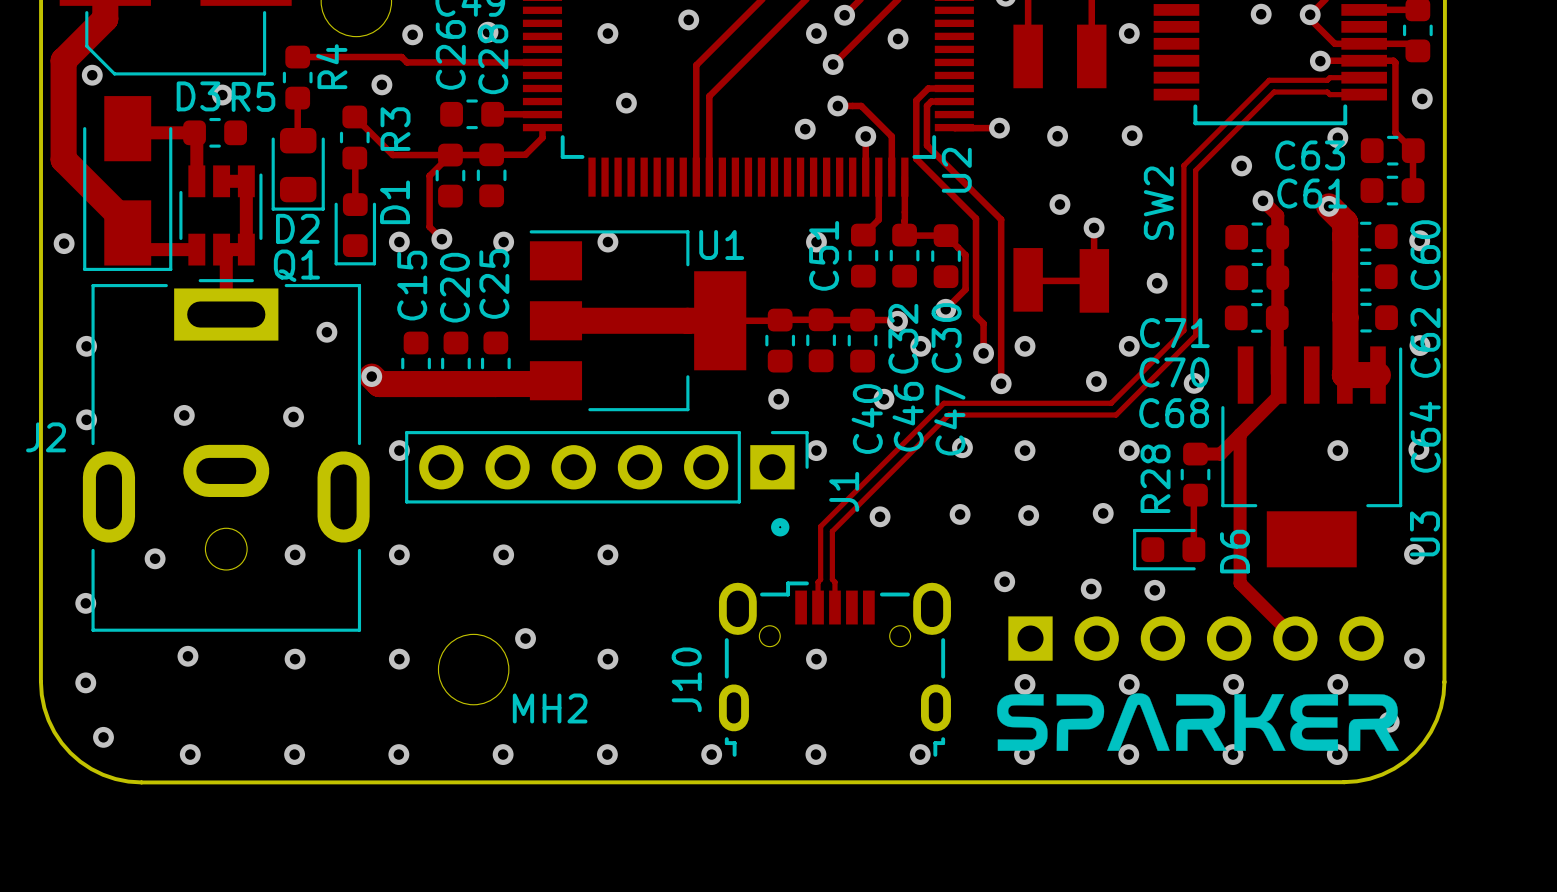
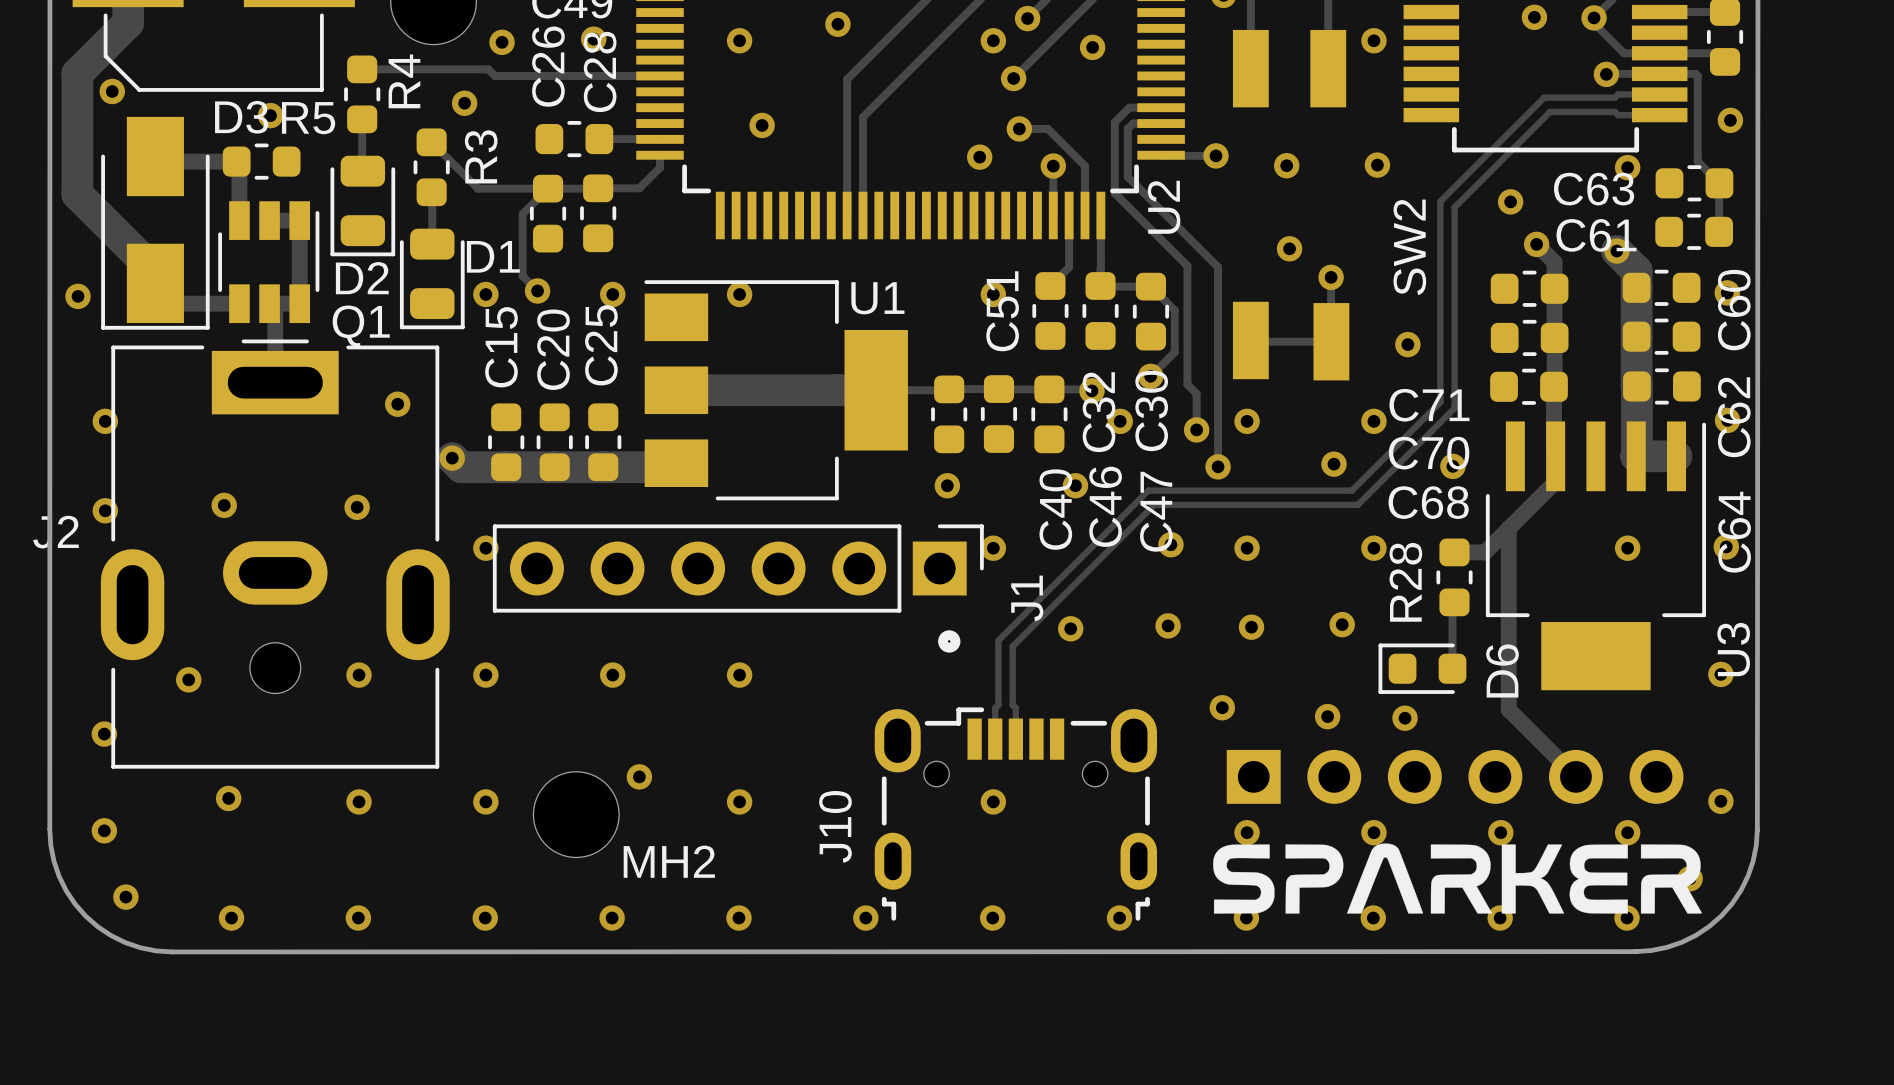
D1 footprint: [334, 193, 377, 266] -> [399, 228, 465, 330]
D1 name rotation: 0° (395, 202) -> 90° clockwise (493, 256)

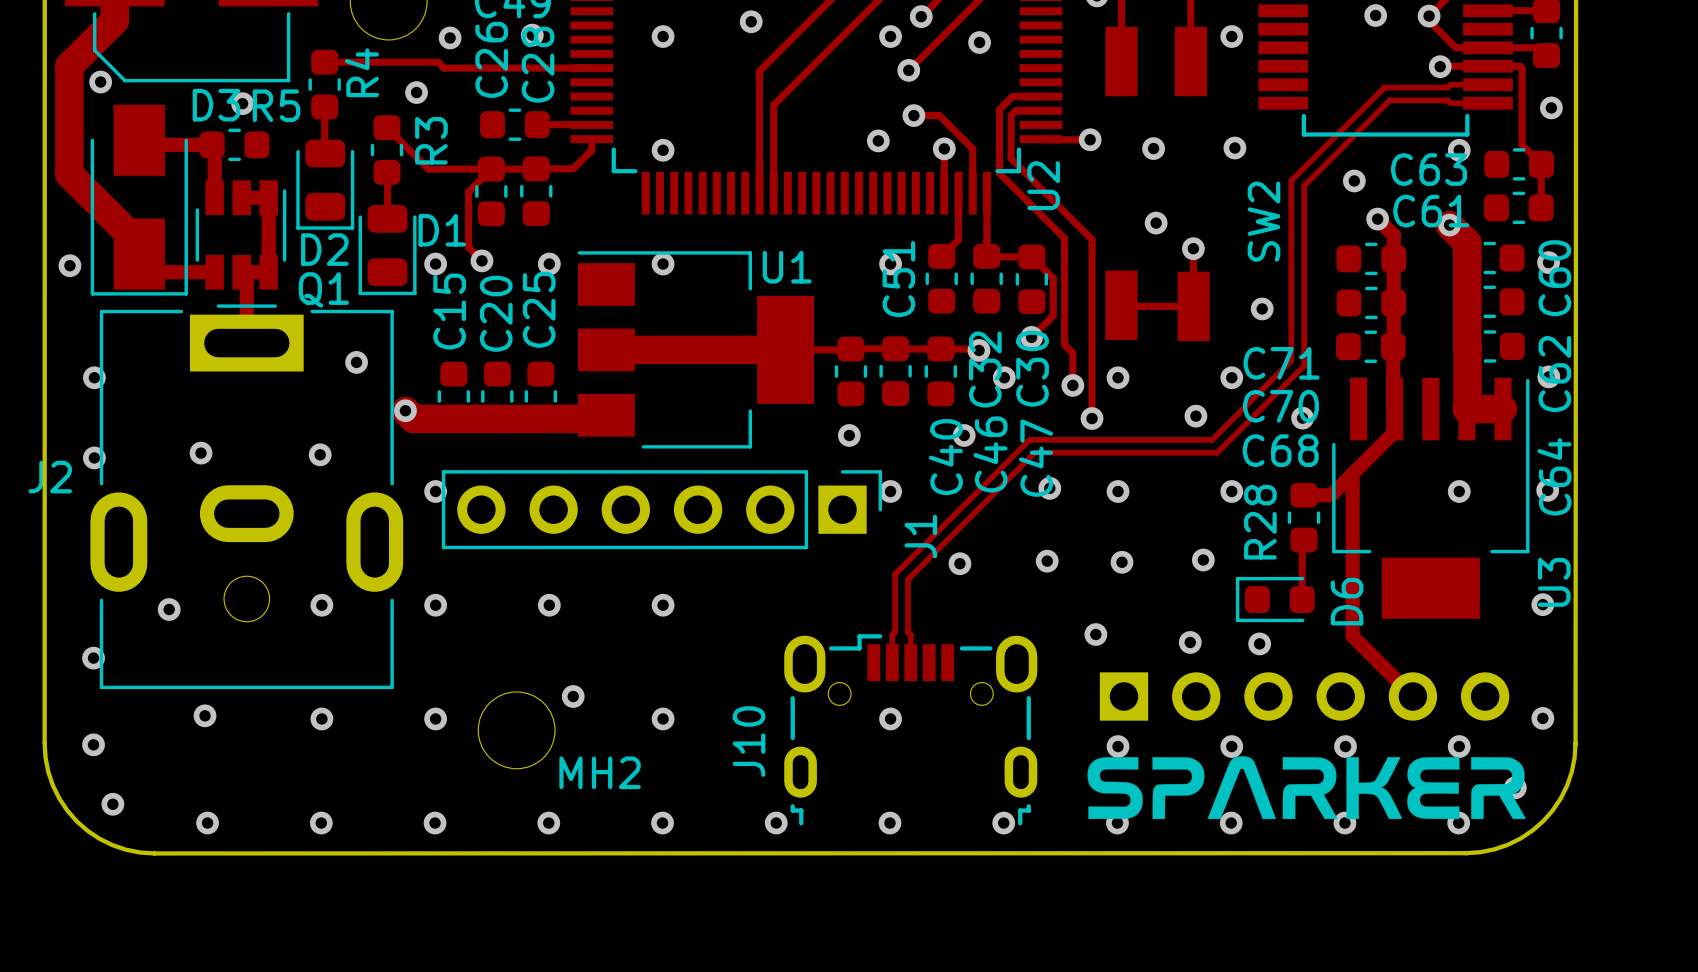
via position: (762, 125) -> (663, 150)
drawing: [938, 630, 961, 653] -> none

